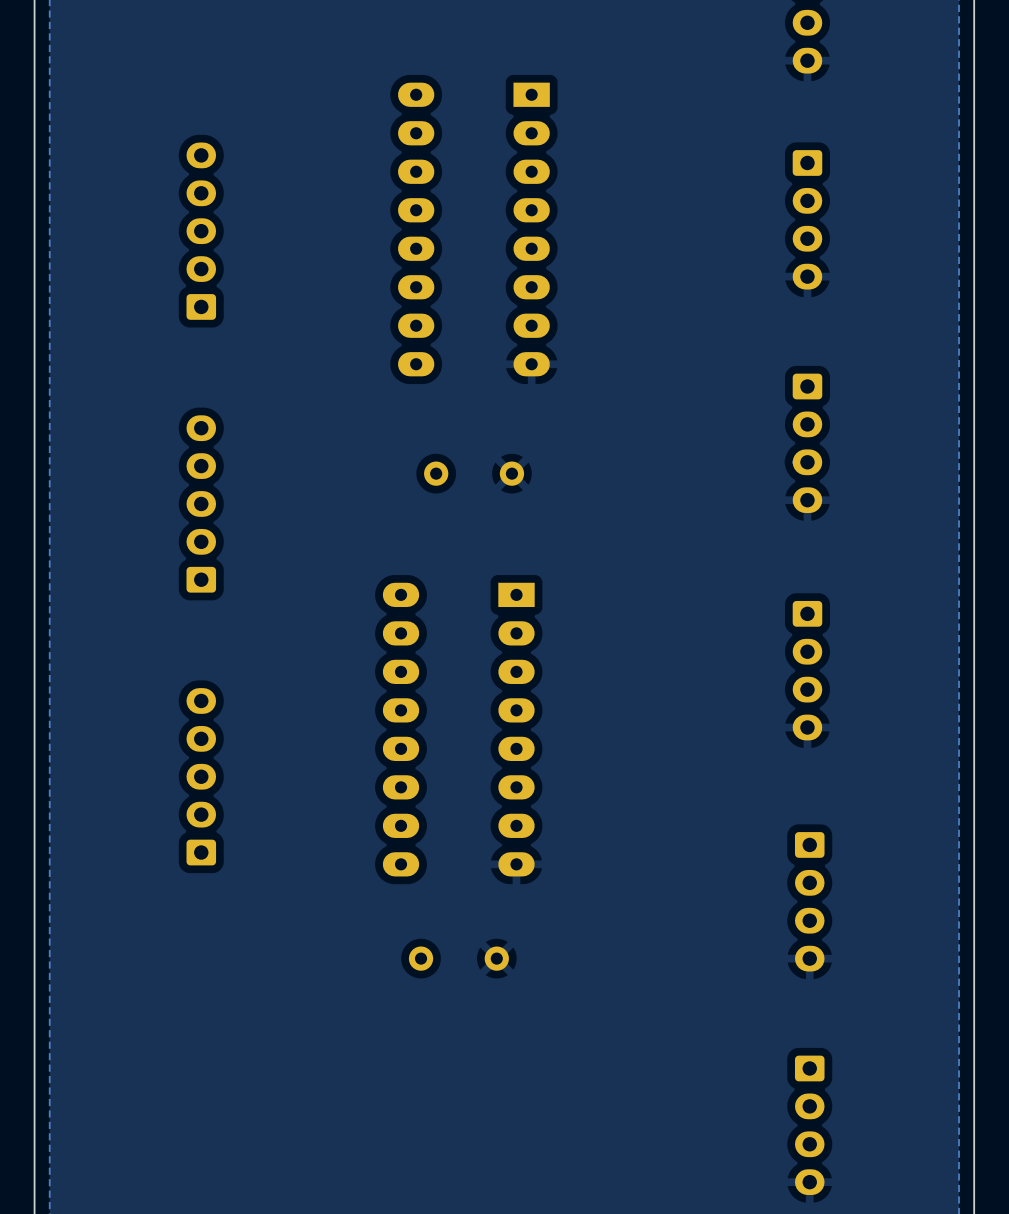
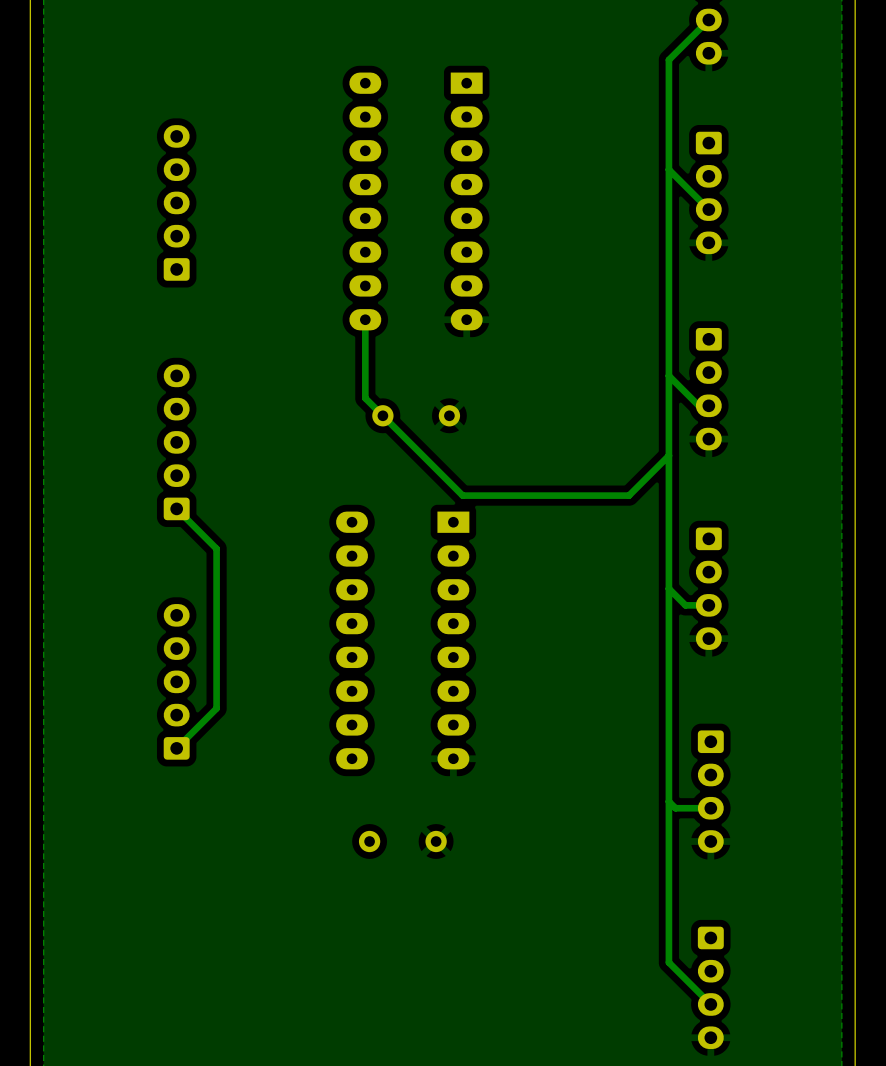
track: none -> (708, 20) (668, 59) (668, 962) (710, 1004)
track: none -> (668, 169) (708, 209)
track: none -> (365, 319) (365, 398) (462, 495) (629, 495) (668, 455)
track: none -> (668, 375) (698, 405)
track: none -> (176, 508) (216, 548) (216, 708) (176, 748)
track: none -> (668, 588) (685, 605) (708, 605)
track: none -> (668, 801) (675, 808) (710, 808)

